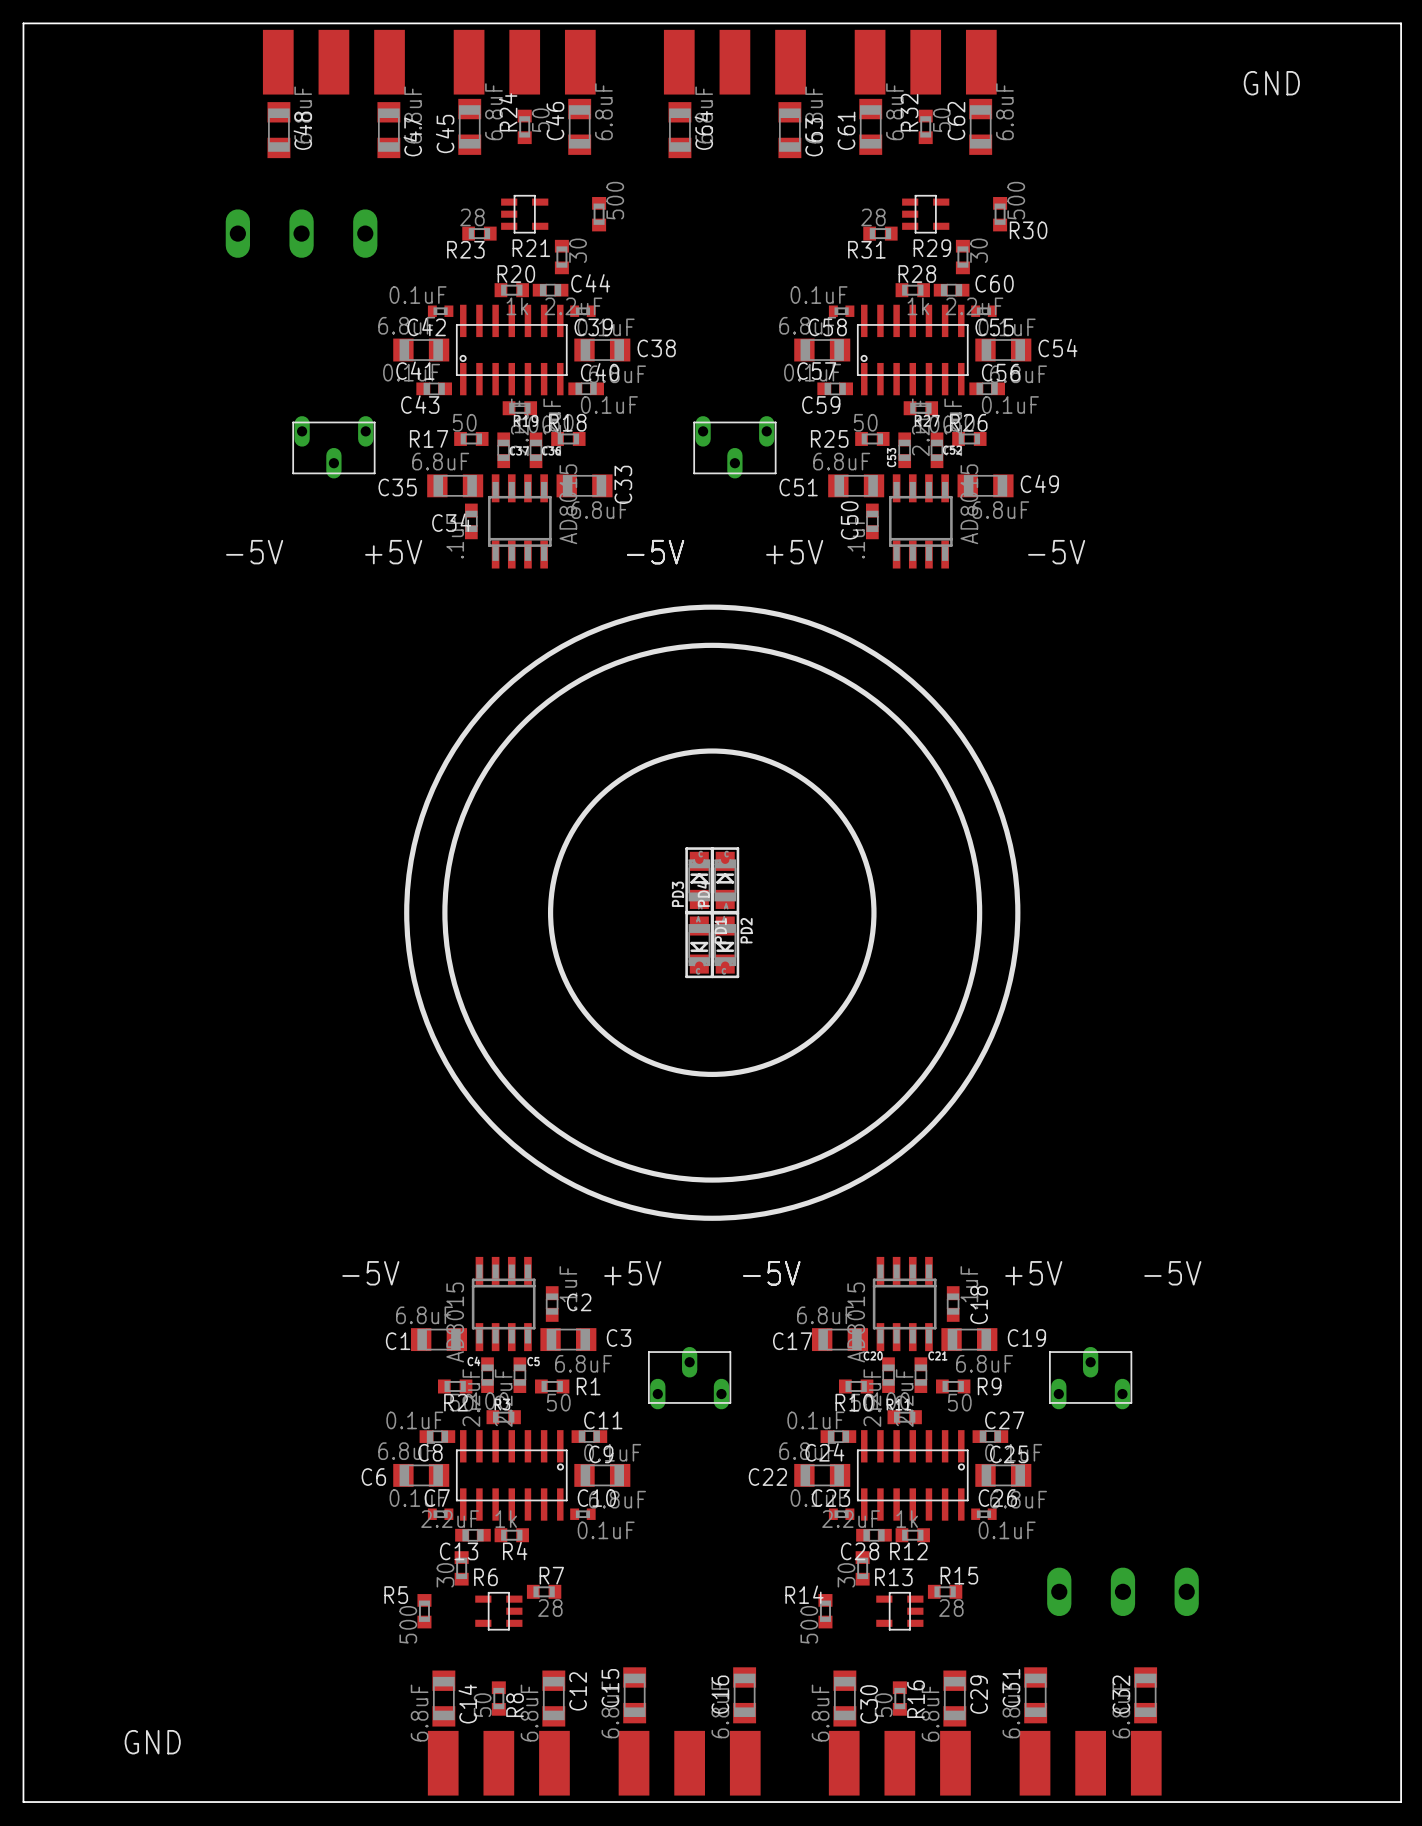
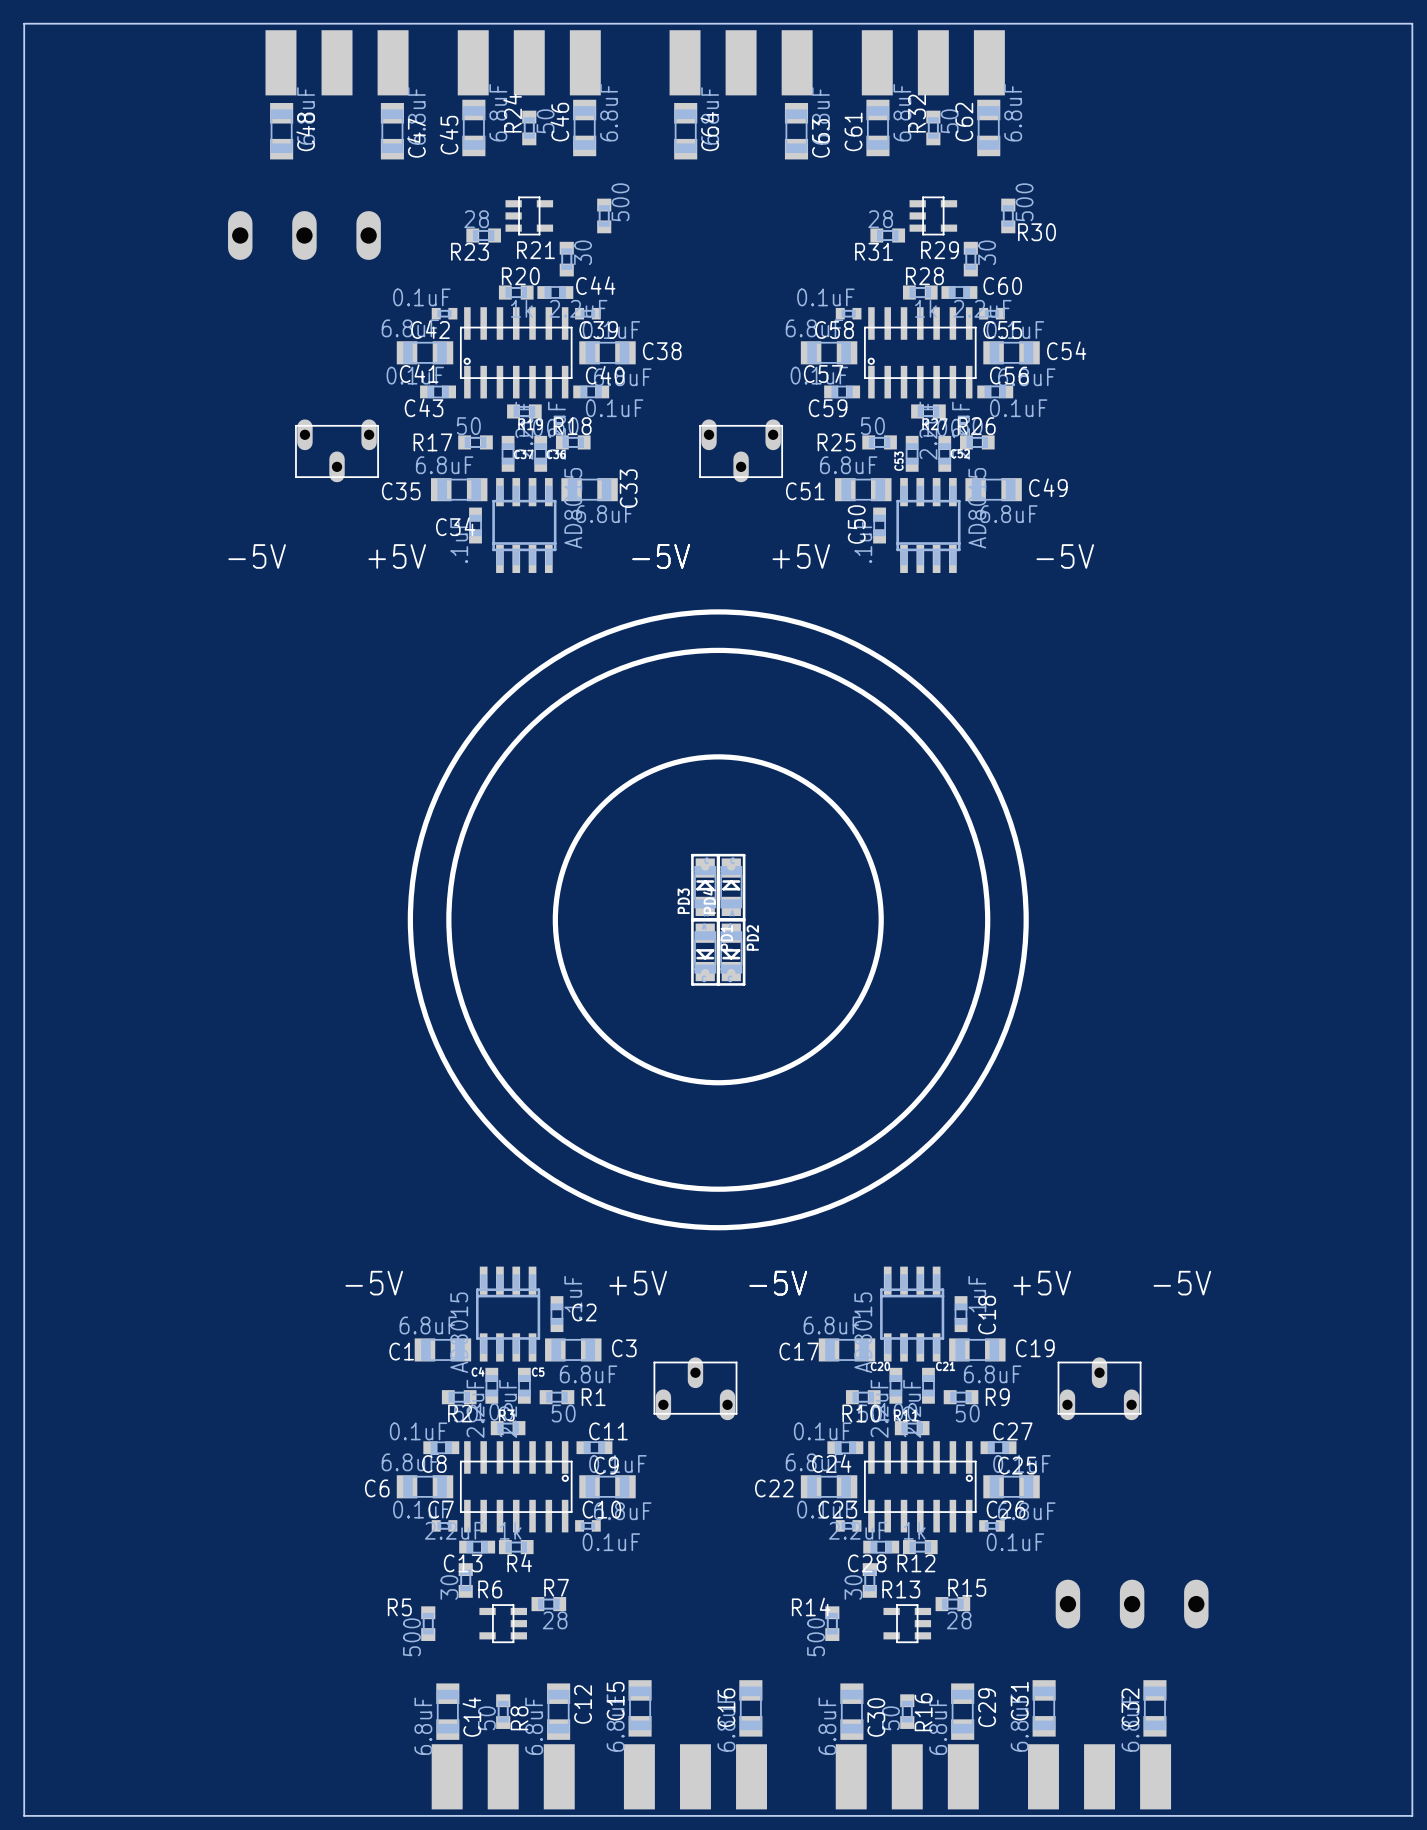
text: GND (1271, 83) -> none
text: GND (152, 1742) -> none

